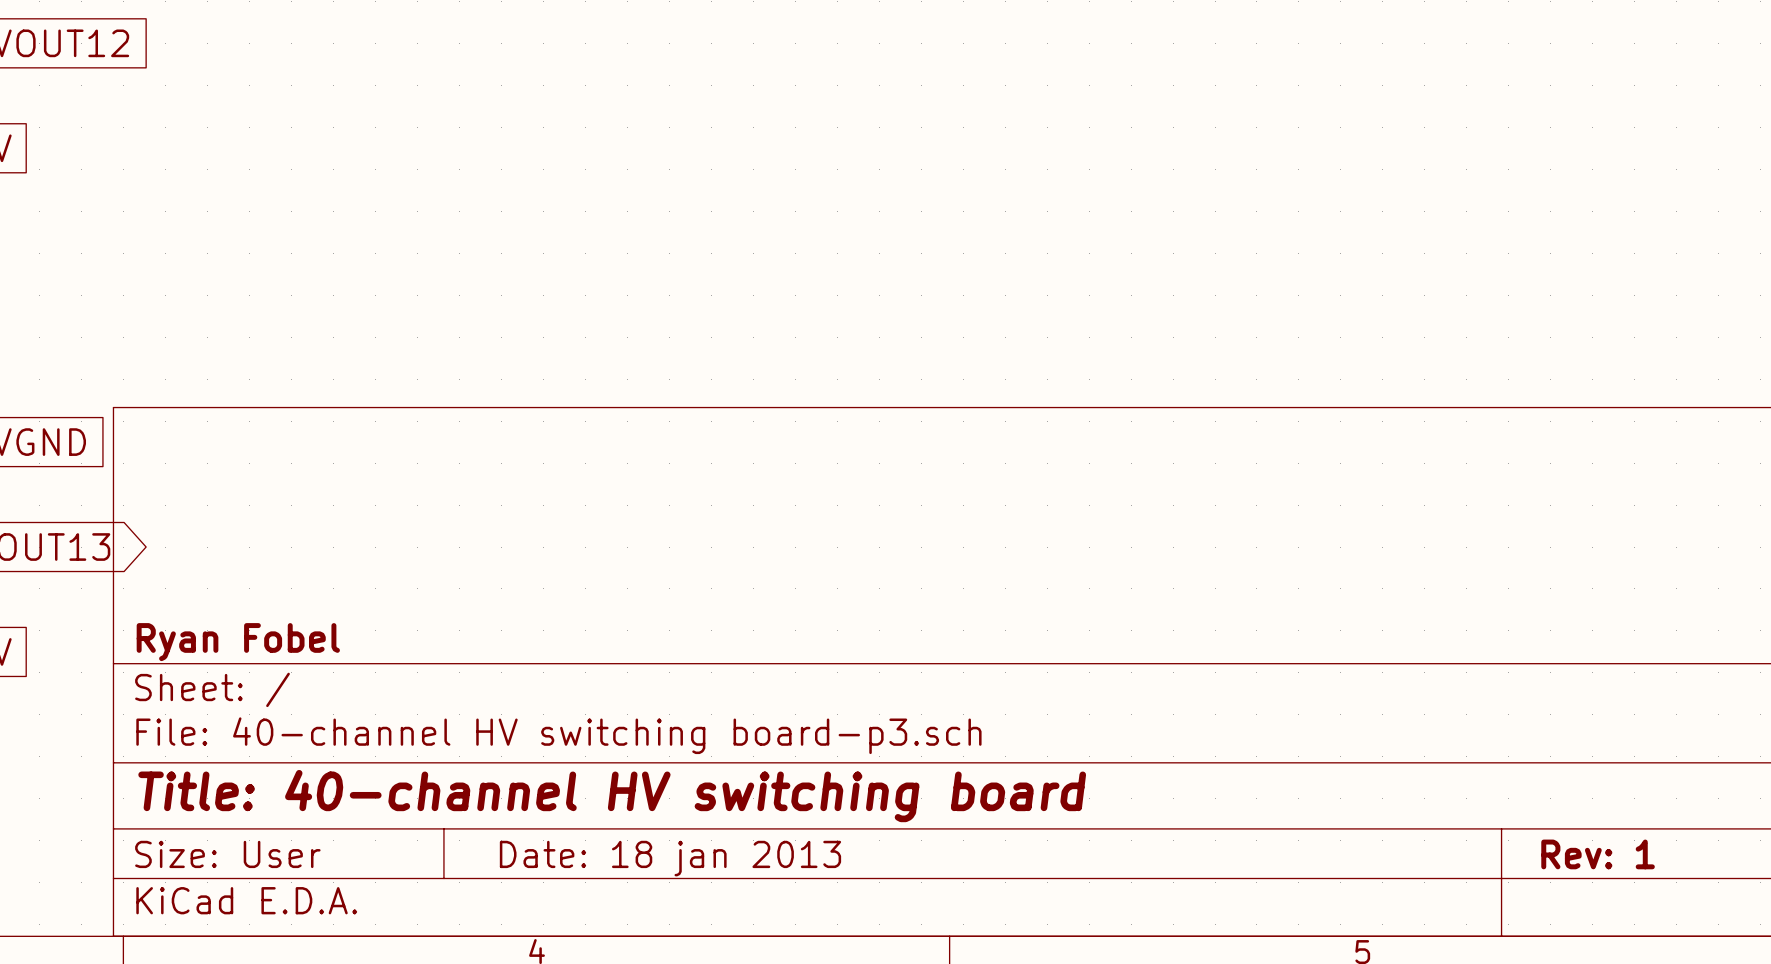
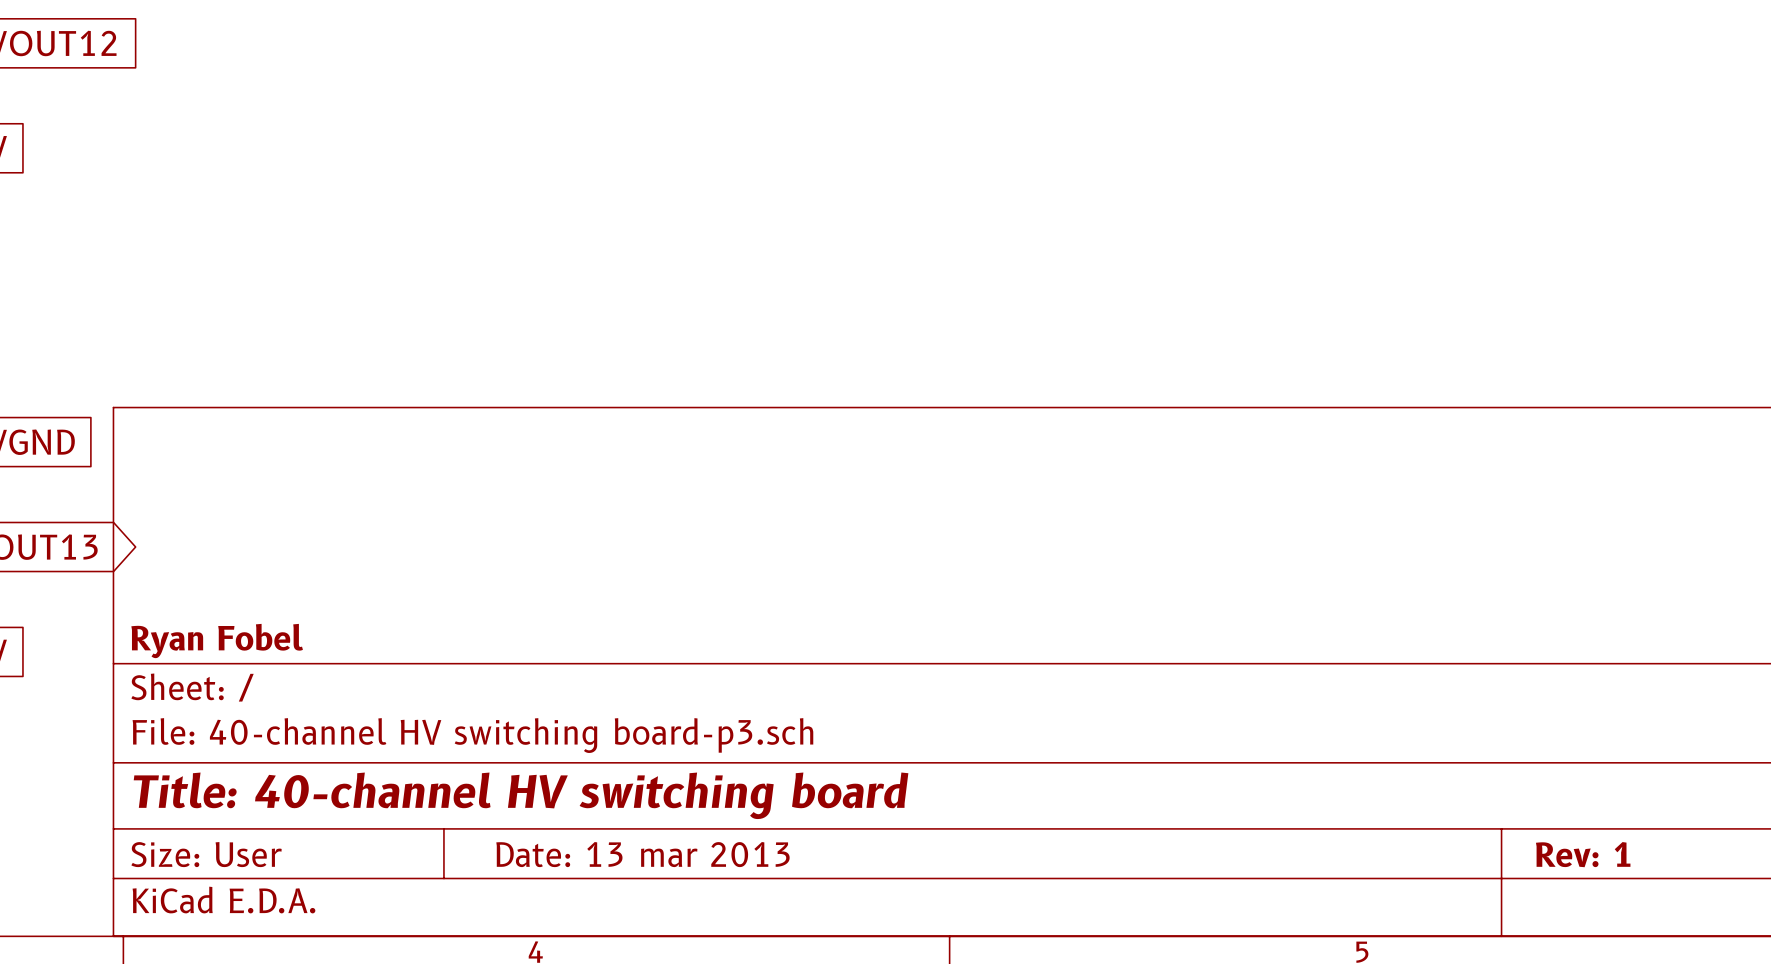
title block: Date: 18 jan 2013 (670, 858) -> Date: 13 mar 2013 (642, 854)

